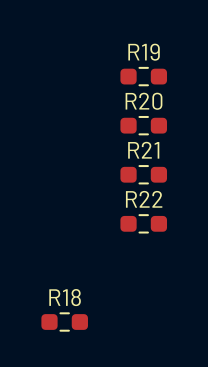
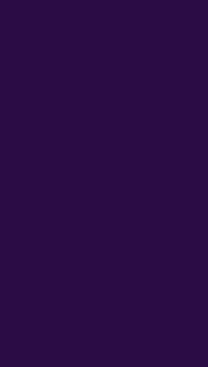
R19: (143, 76) -> none
R20: (143, 125) -> none
R21: (143, 174) -> none
R22: (143, 223) -> none
R18: (64, 322) -> none

